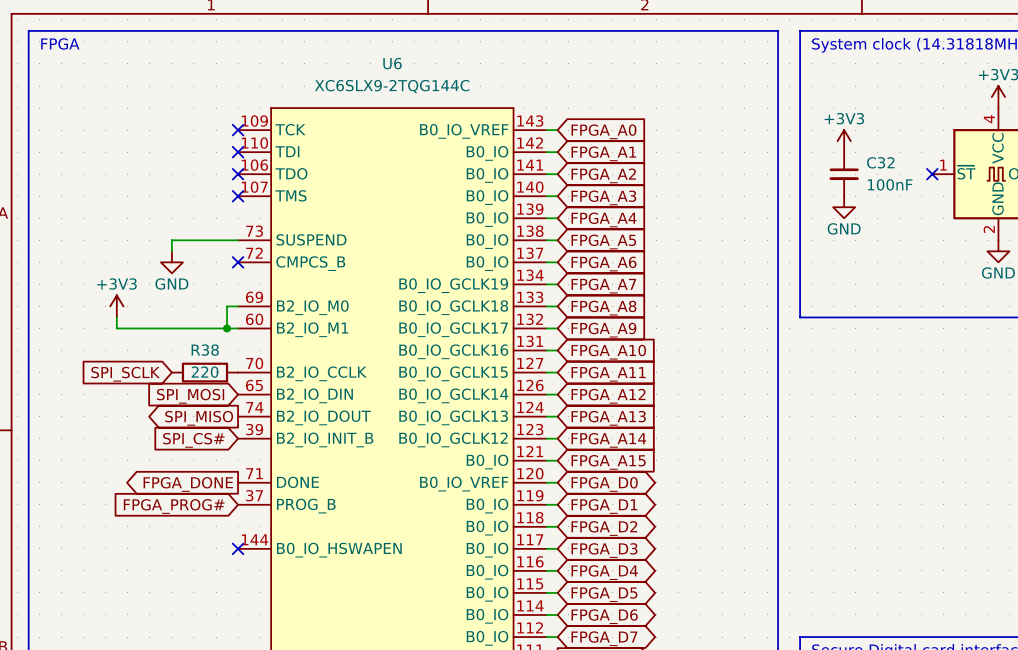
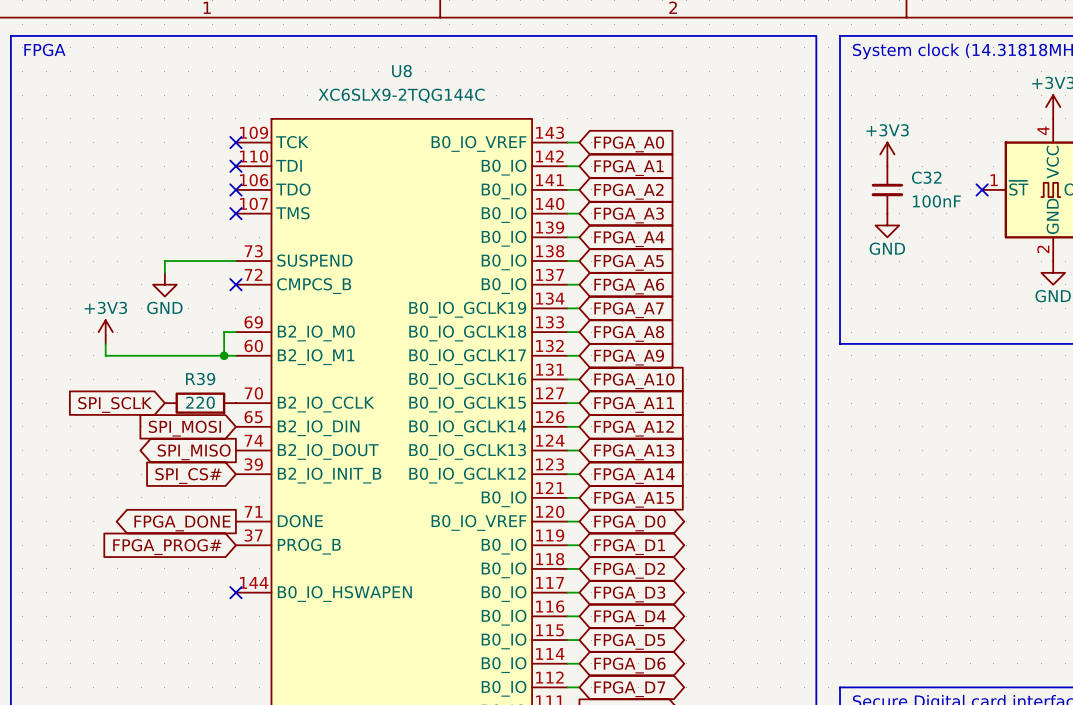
U6 name: U6 (392, 63) -> U8 (401, 71)
R38 name: R38 (205, 350) -> R39 (200, 379)

